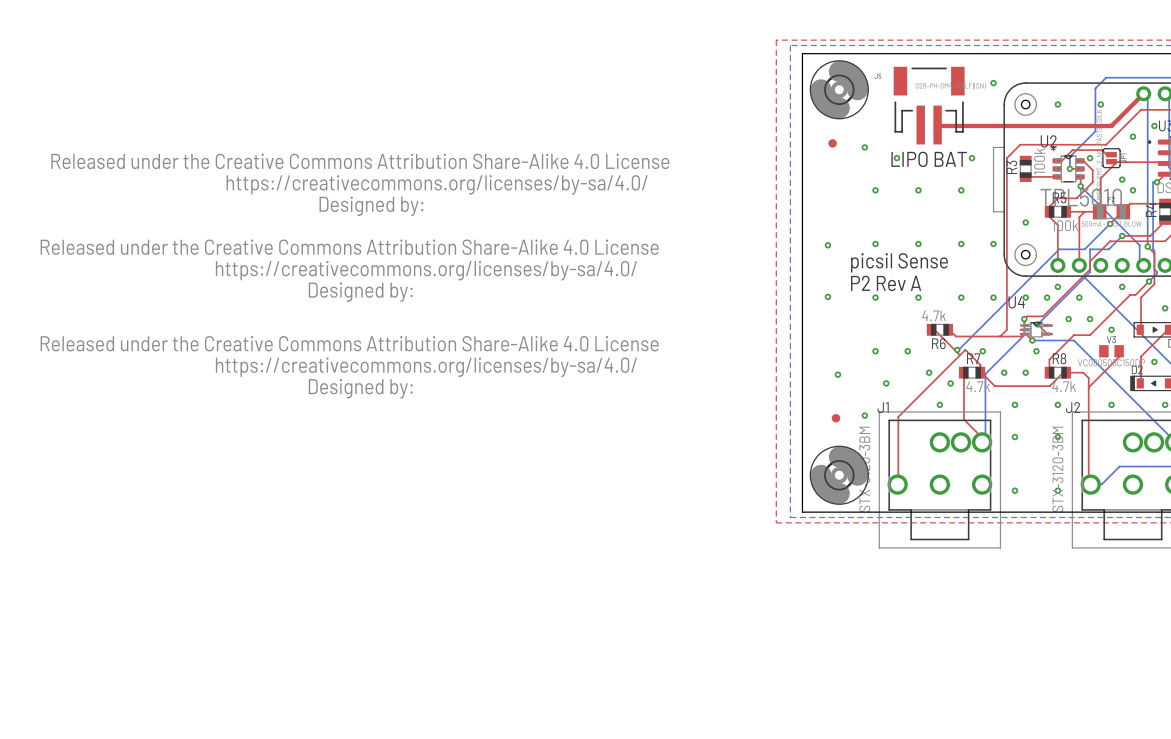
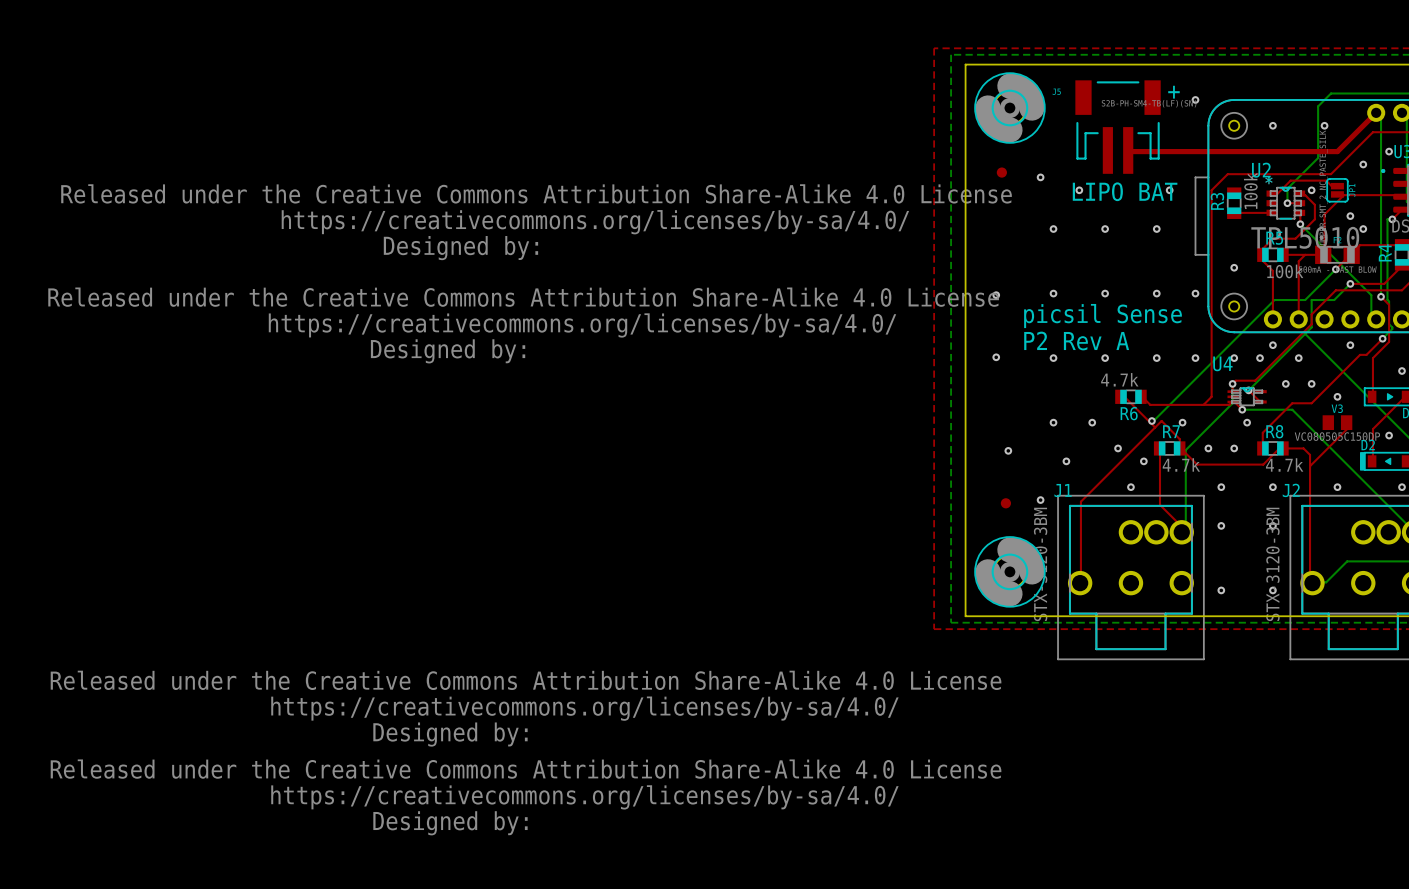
text: none -> + (1173, 92)
drawing: [40, 336, 659, 399] -> none
drawing: none -> [50, 670, 1002, 836]

